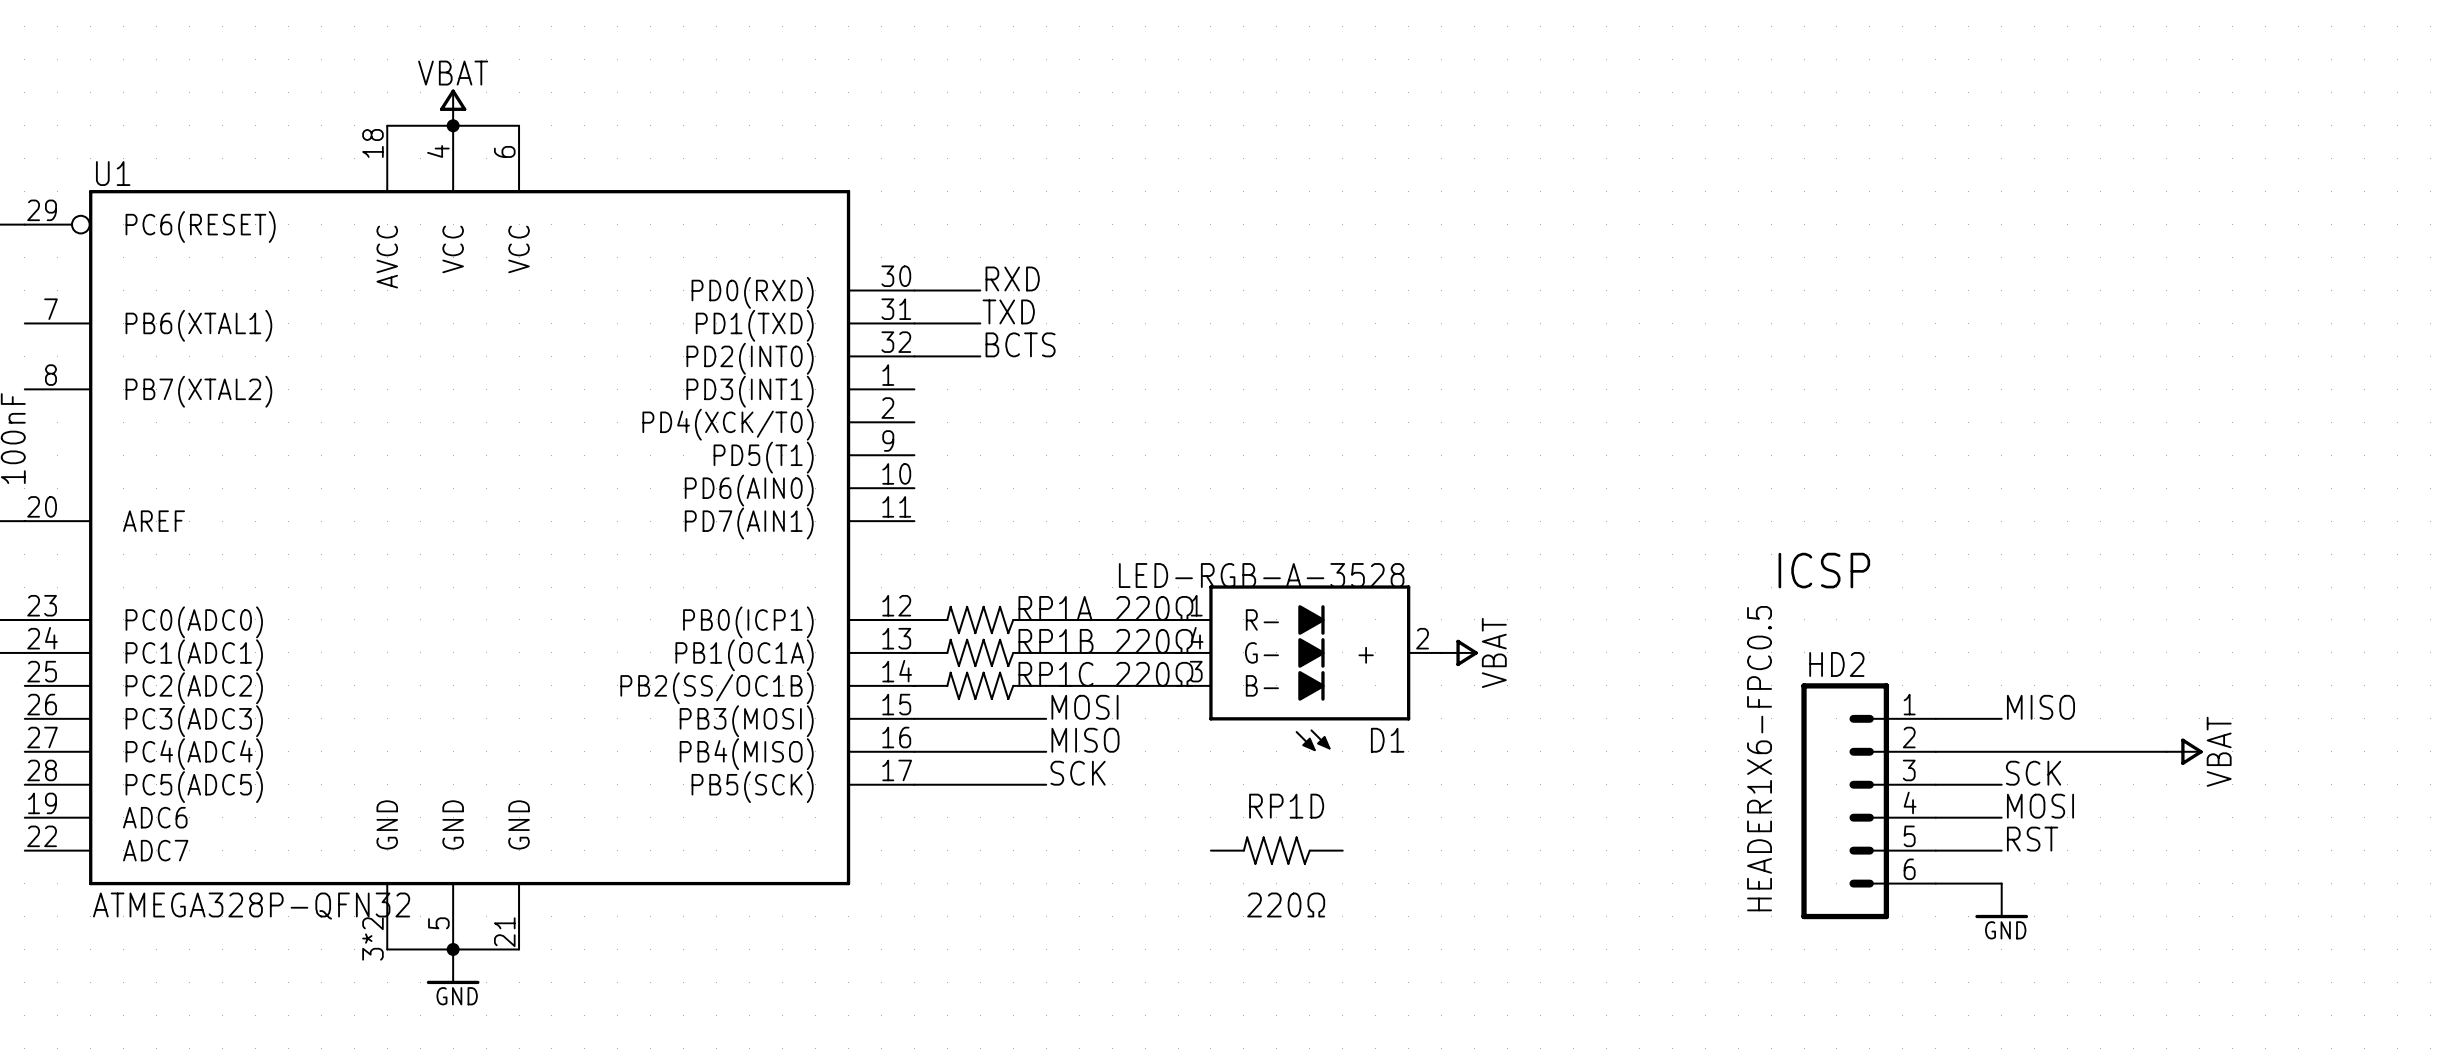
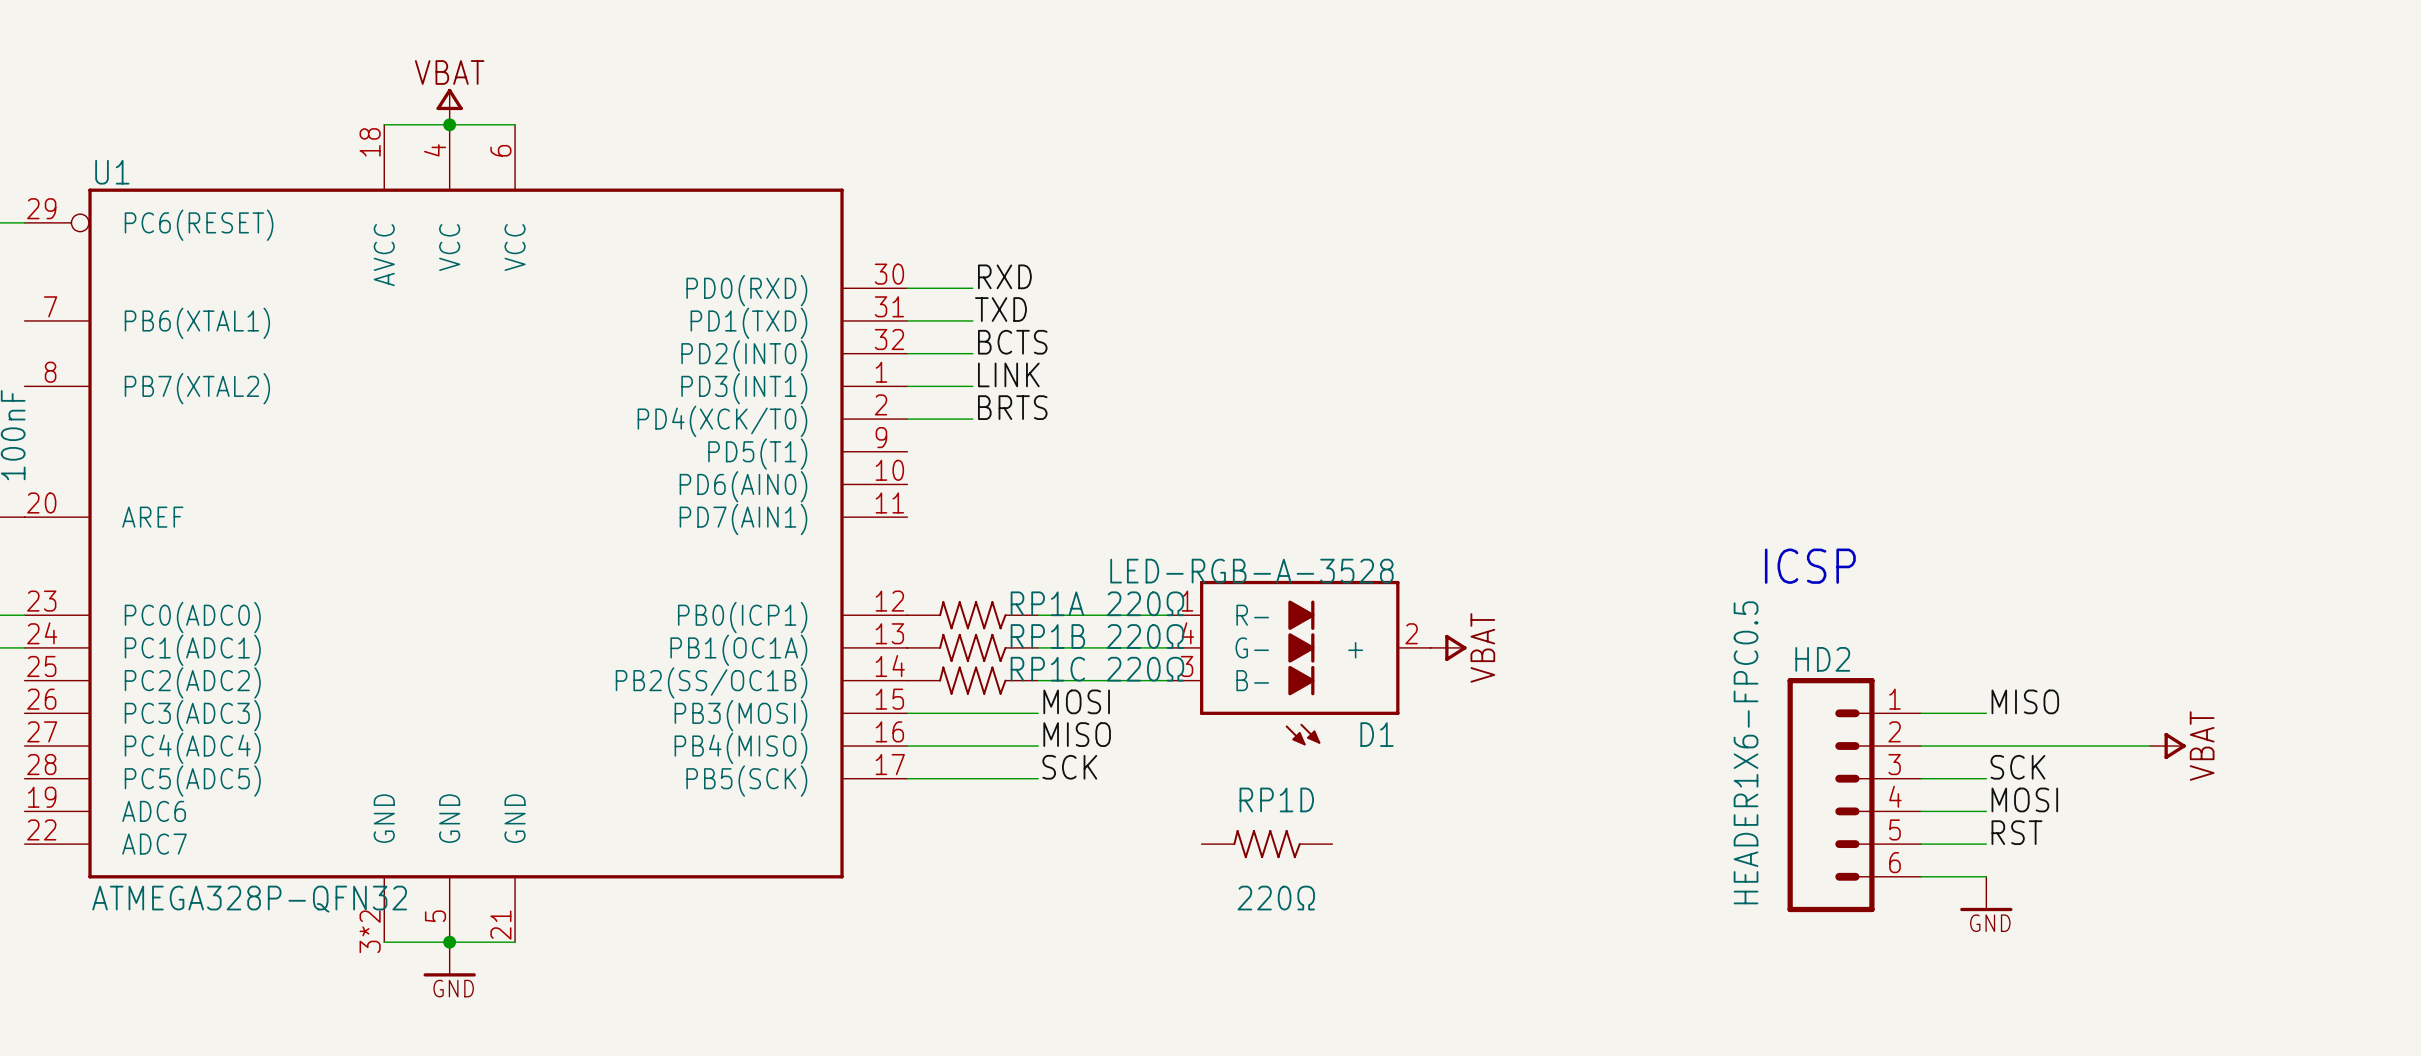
label: none -> LINK (1008, 374)
wire: none -> (907, 386) (972, 386)
label: none -> BRTS (1012, 407)
wire: none -> (907, 419) (972, 419)

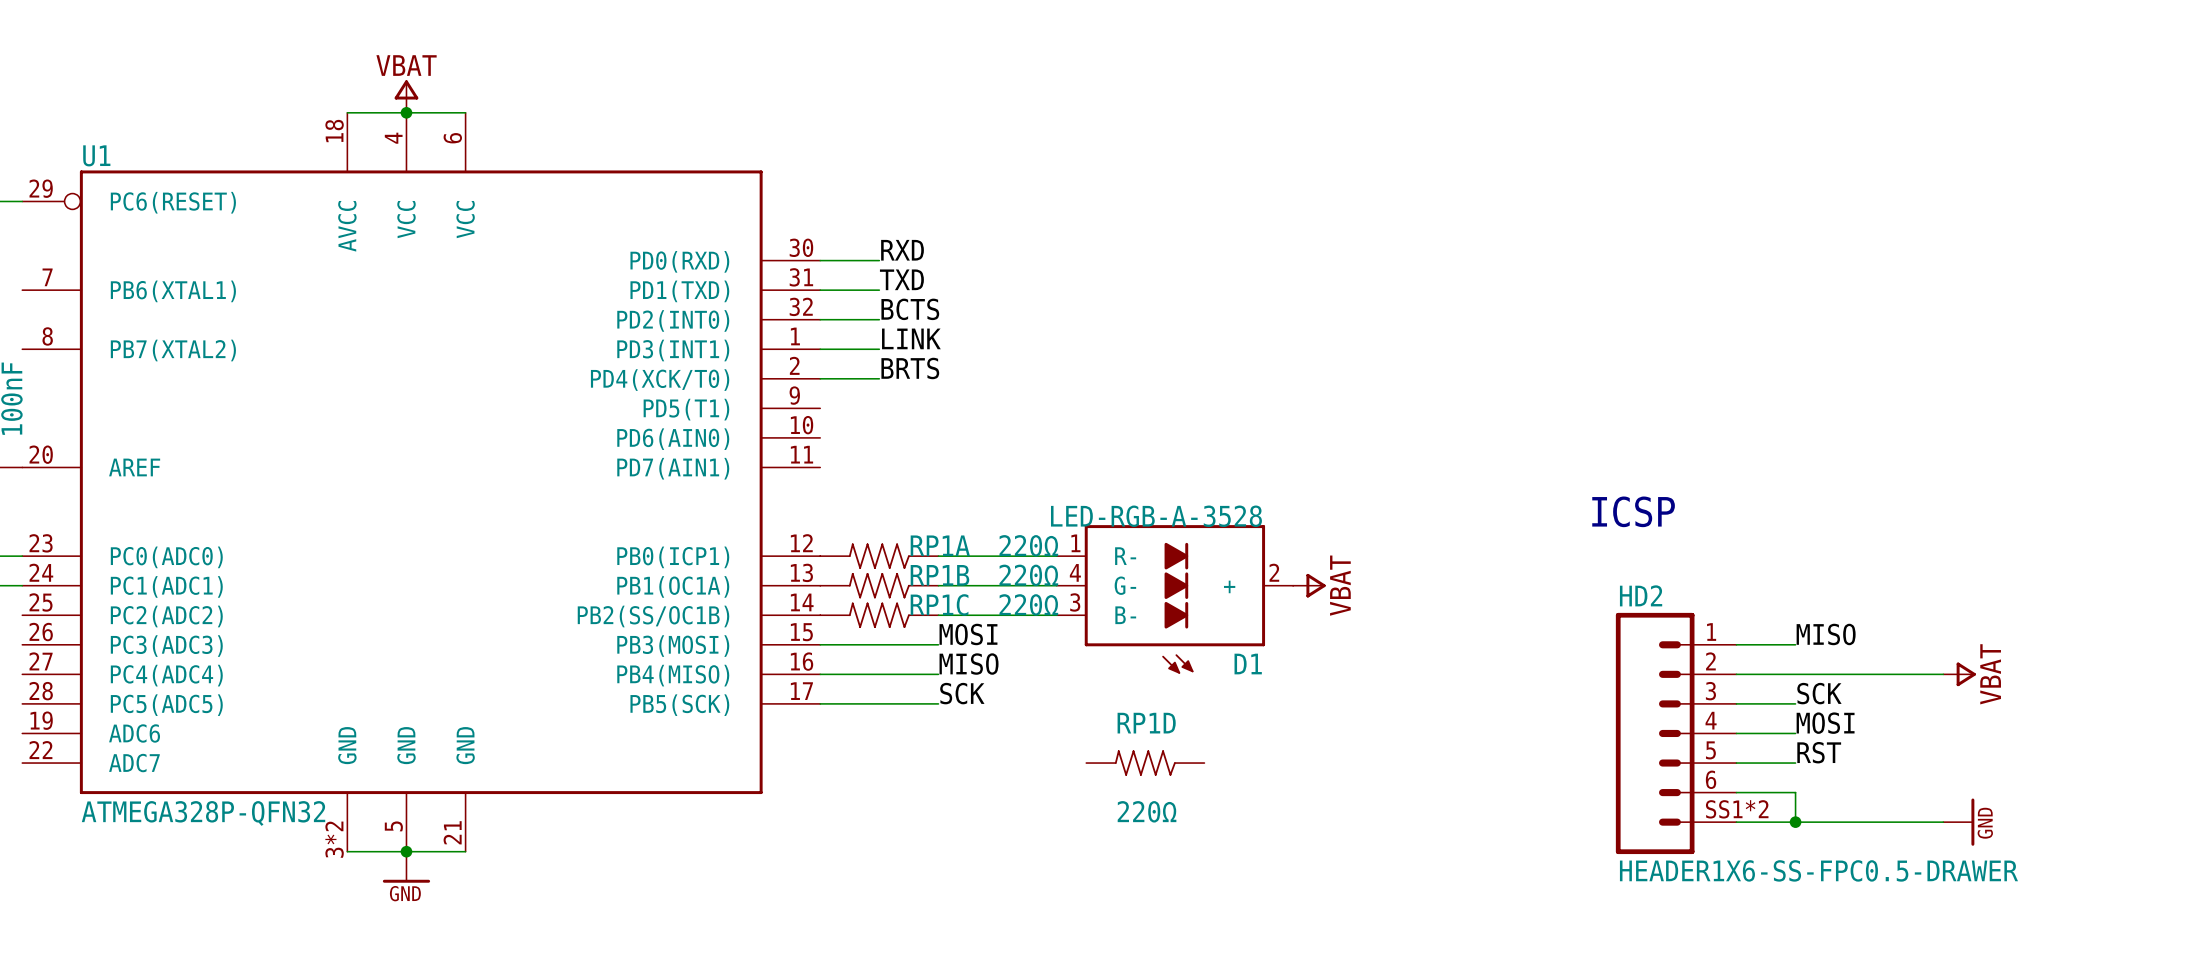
HD2 symbol: [1787, 678, 1921, 913] -> [1615, 612, 1737, 855]
HD2 value: HEADER1X6-FPC0.5 (1746, 752) -> HEADER1X6-SS-FPC0.5-DRAWER (1818, 870)
power symbol position: (1986, 893) -> (1958, 822)
wire: none -> (1736, 822) (1943, 822)
power symbol rotation: 0° (1986, 909) -> 90° counterclockwise (1972, 822)
junction: none -> (1795, 822)

